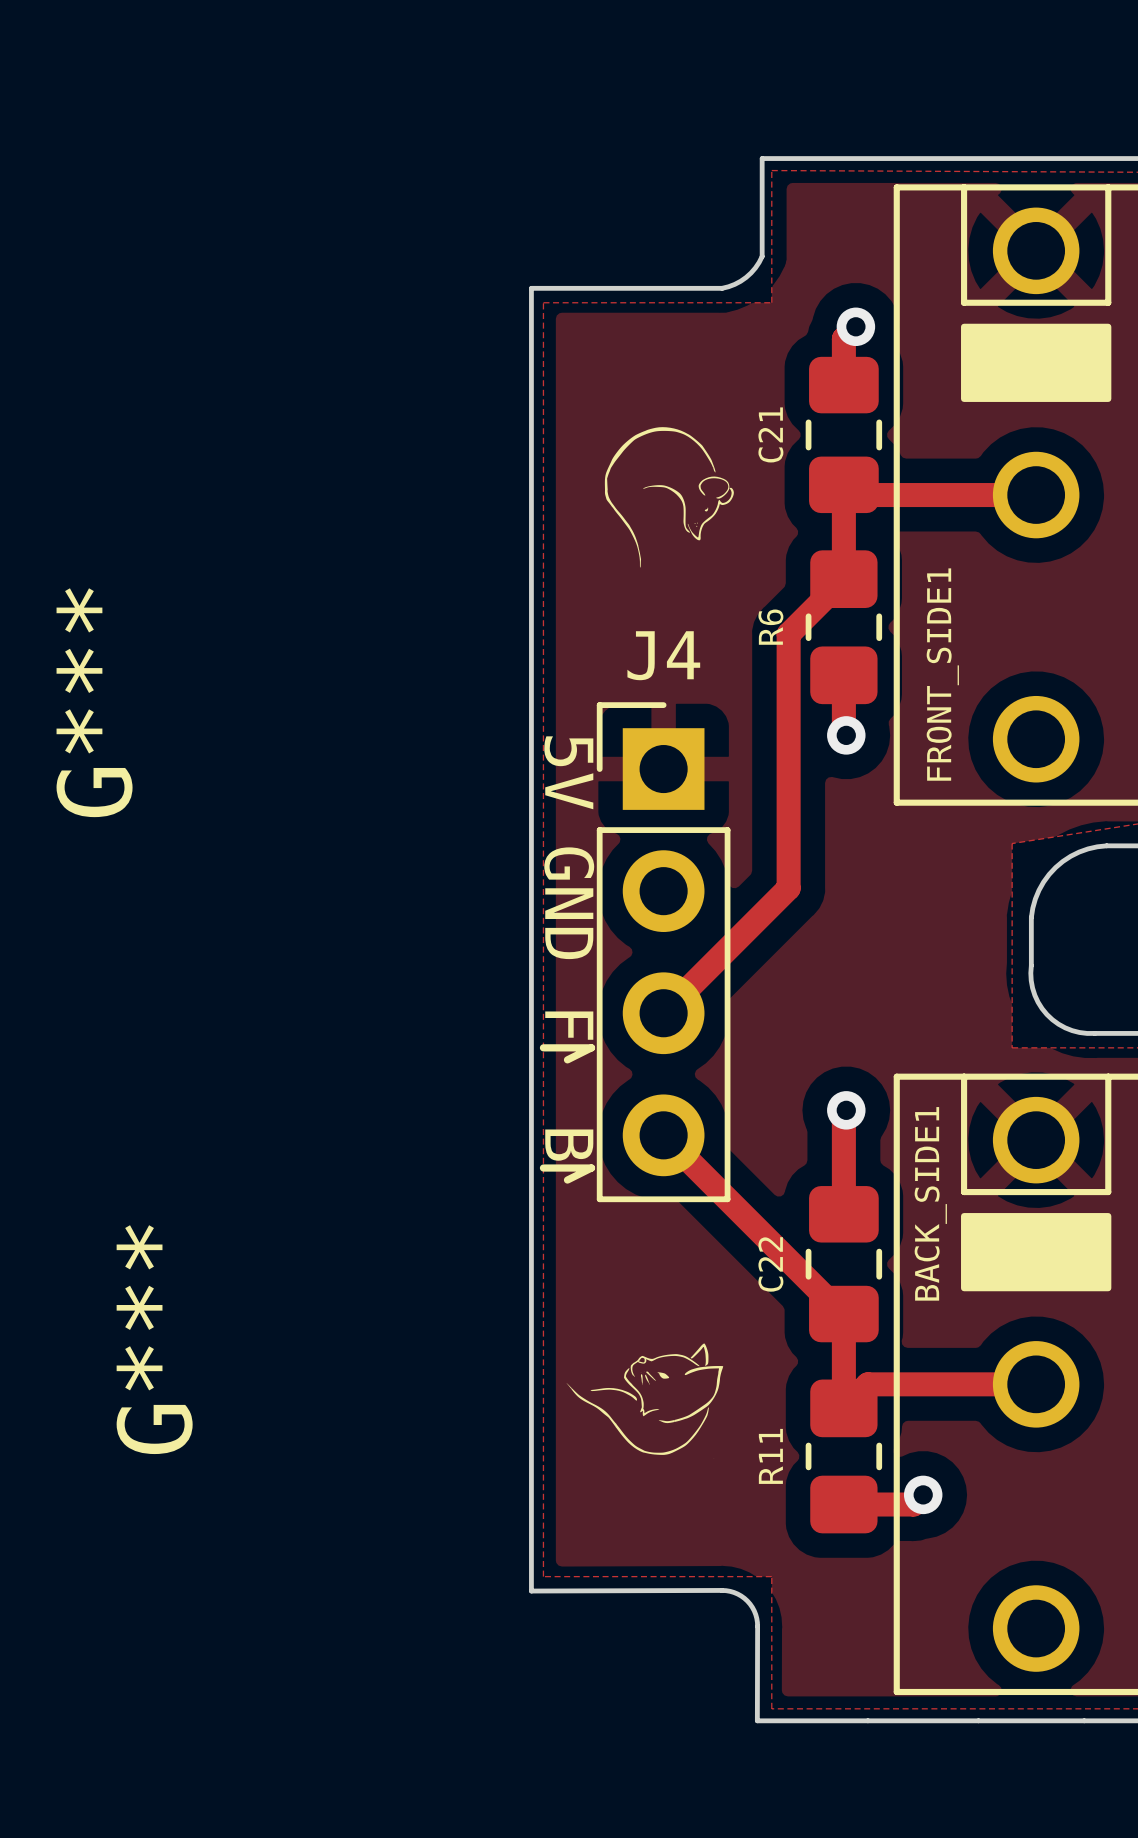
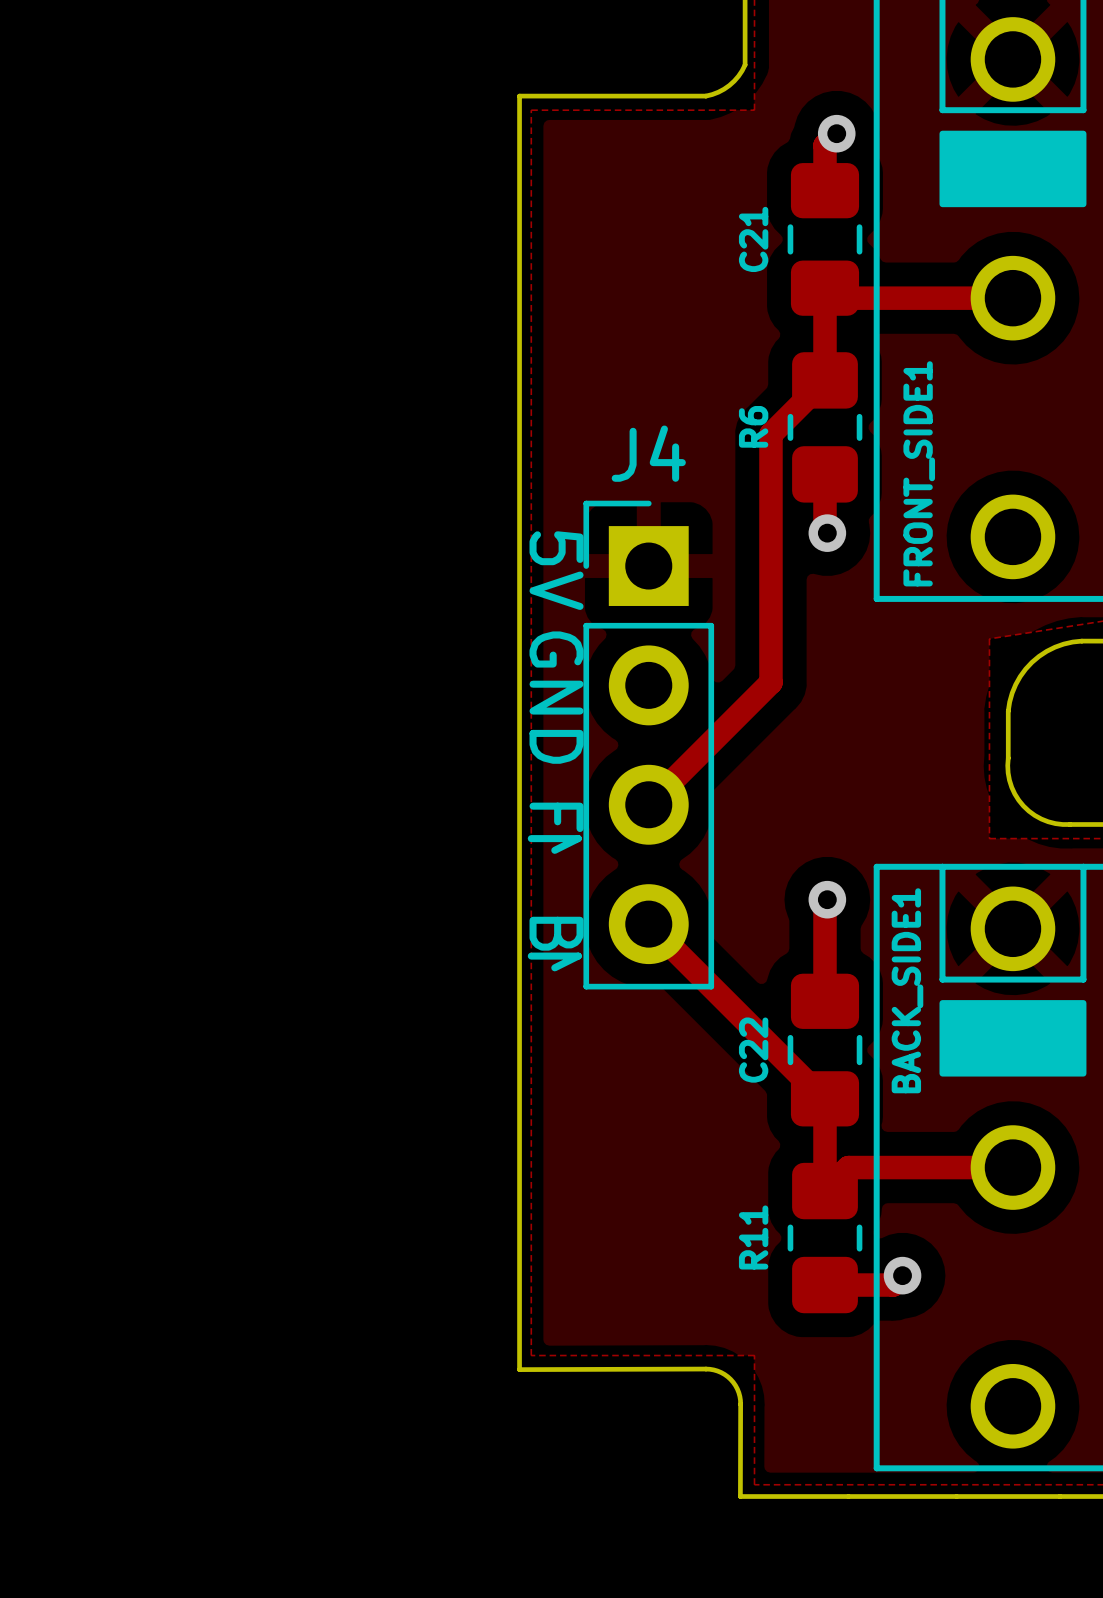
G***: (669, 497) -> none
G***: (644, 1401) -> none

